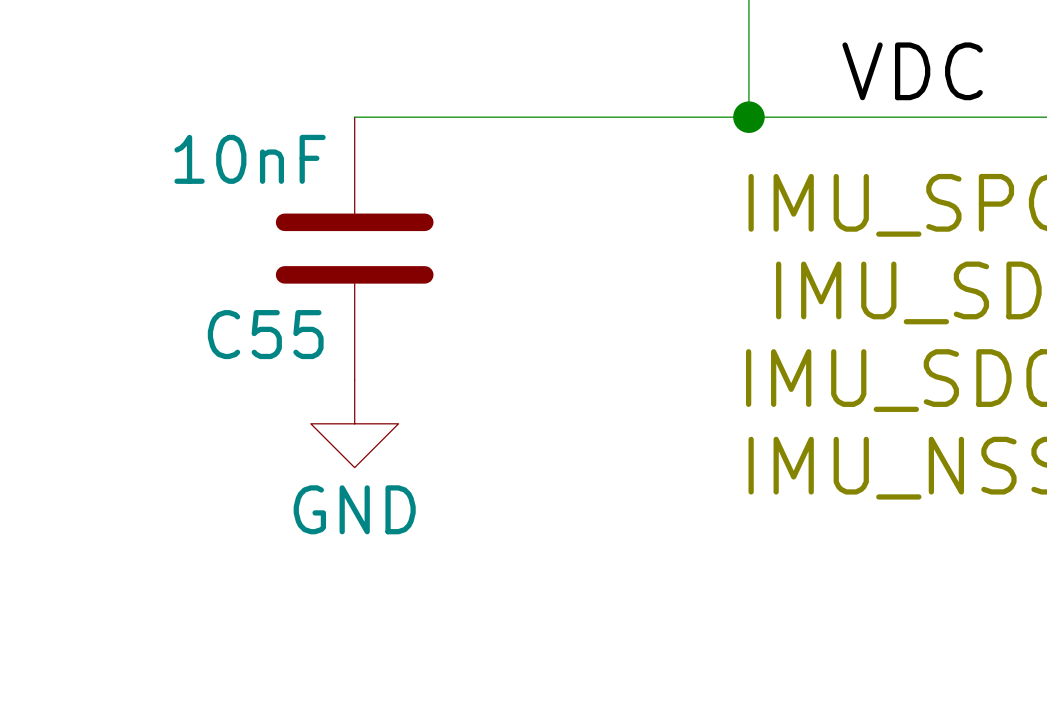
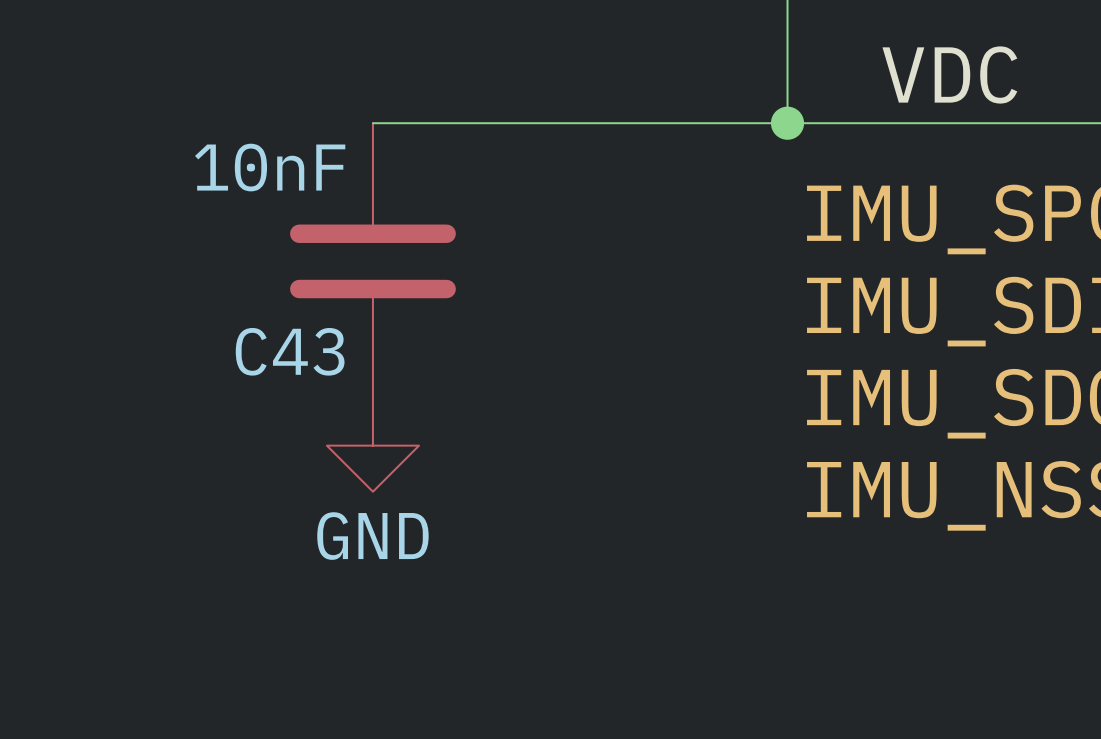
C55 name: C55 (265, 334) -> C43 (290, 351)

